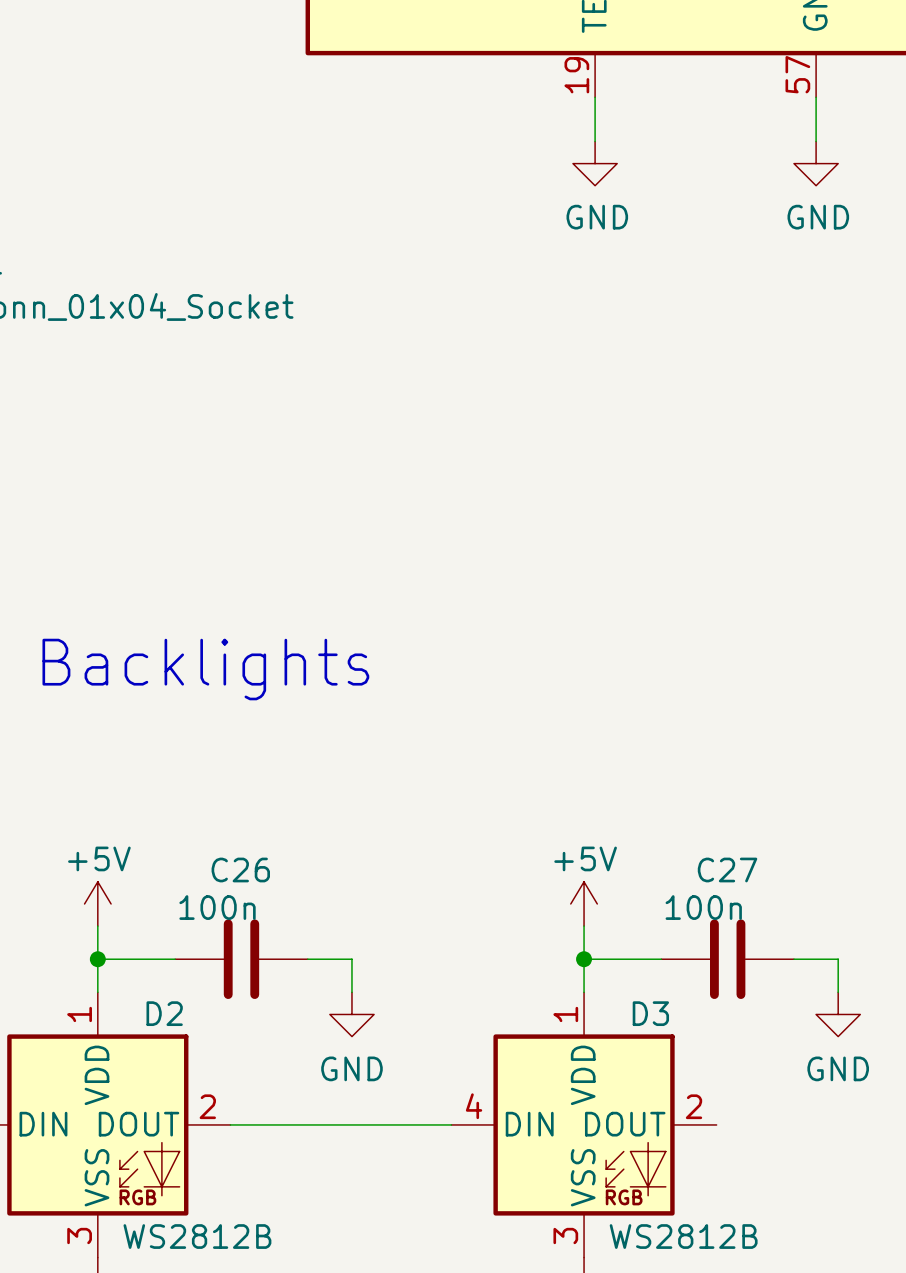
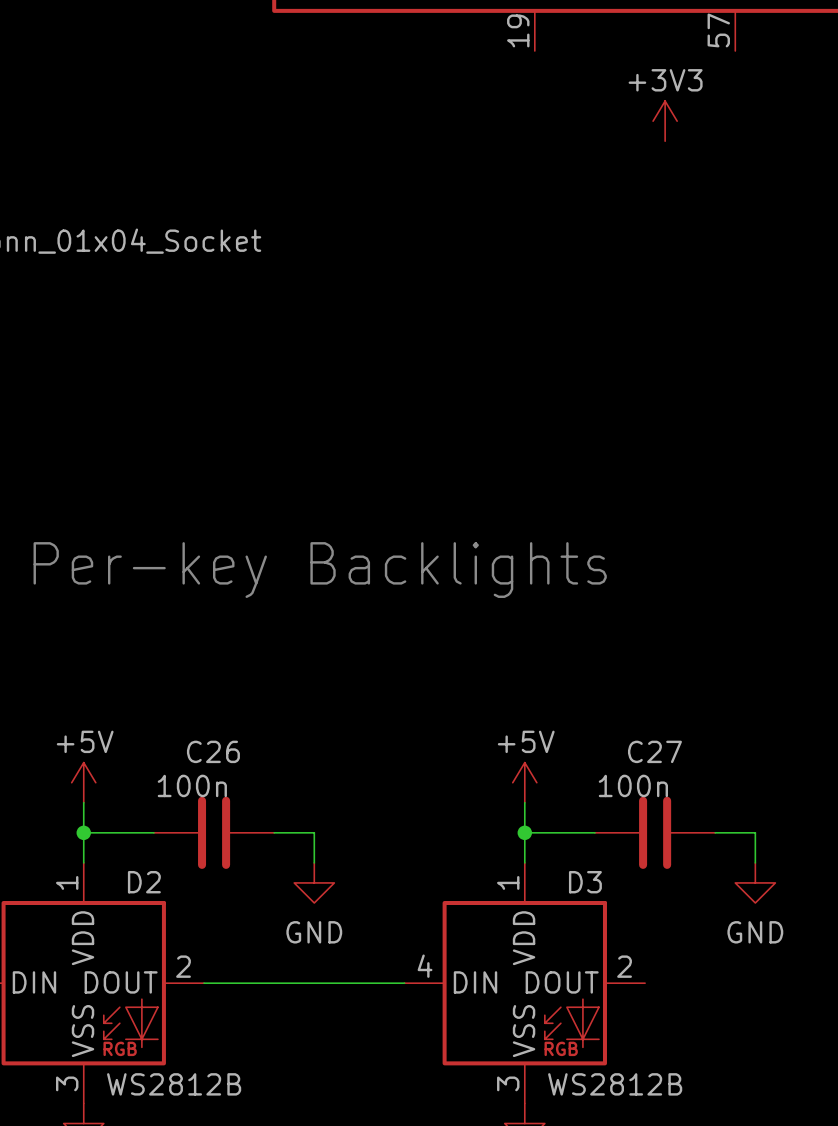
wire: (595, 97) (595, 141) -> none
wire: (816, 97) (816, 141) -> none
power symbol: GND (595, 163) -> none
power symbol: GND (816, 163) -> none
power symbol: none -> +3V3 (665, 121)
text: Backlights (205, 669) -> Per-key Backlights (320, 570)

